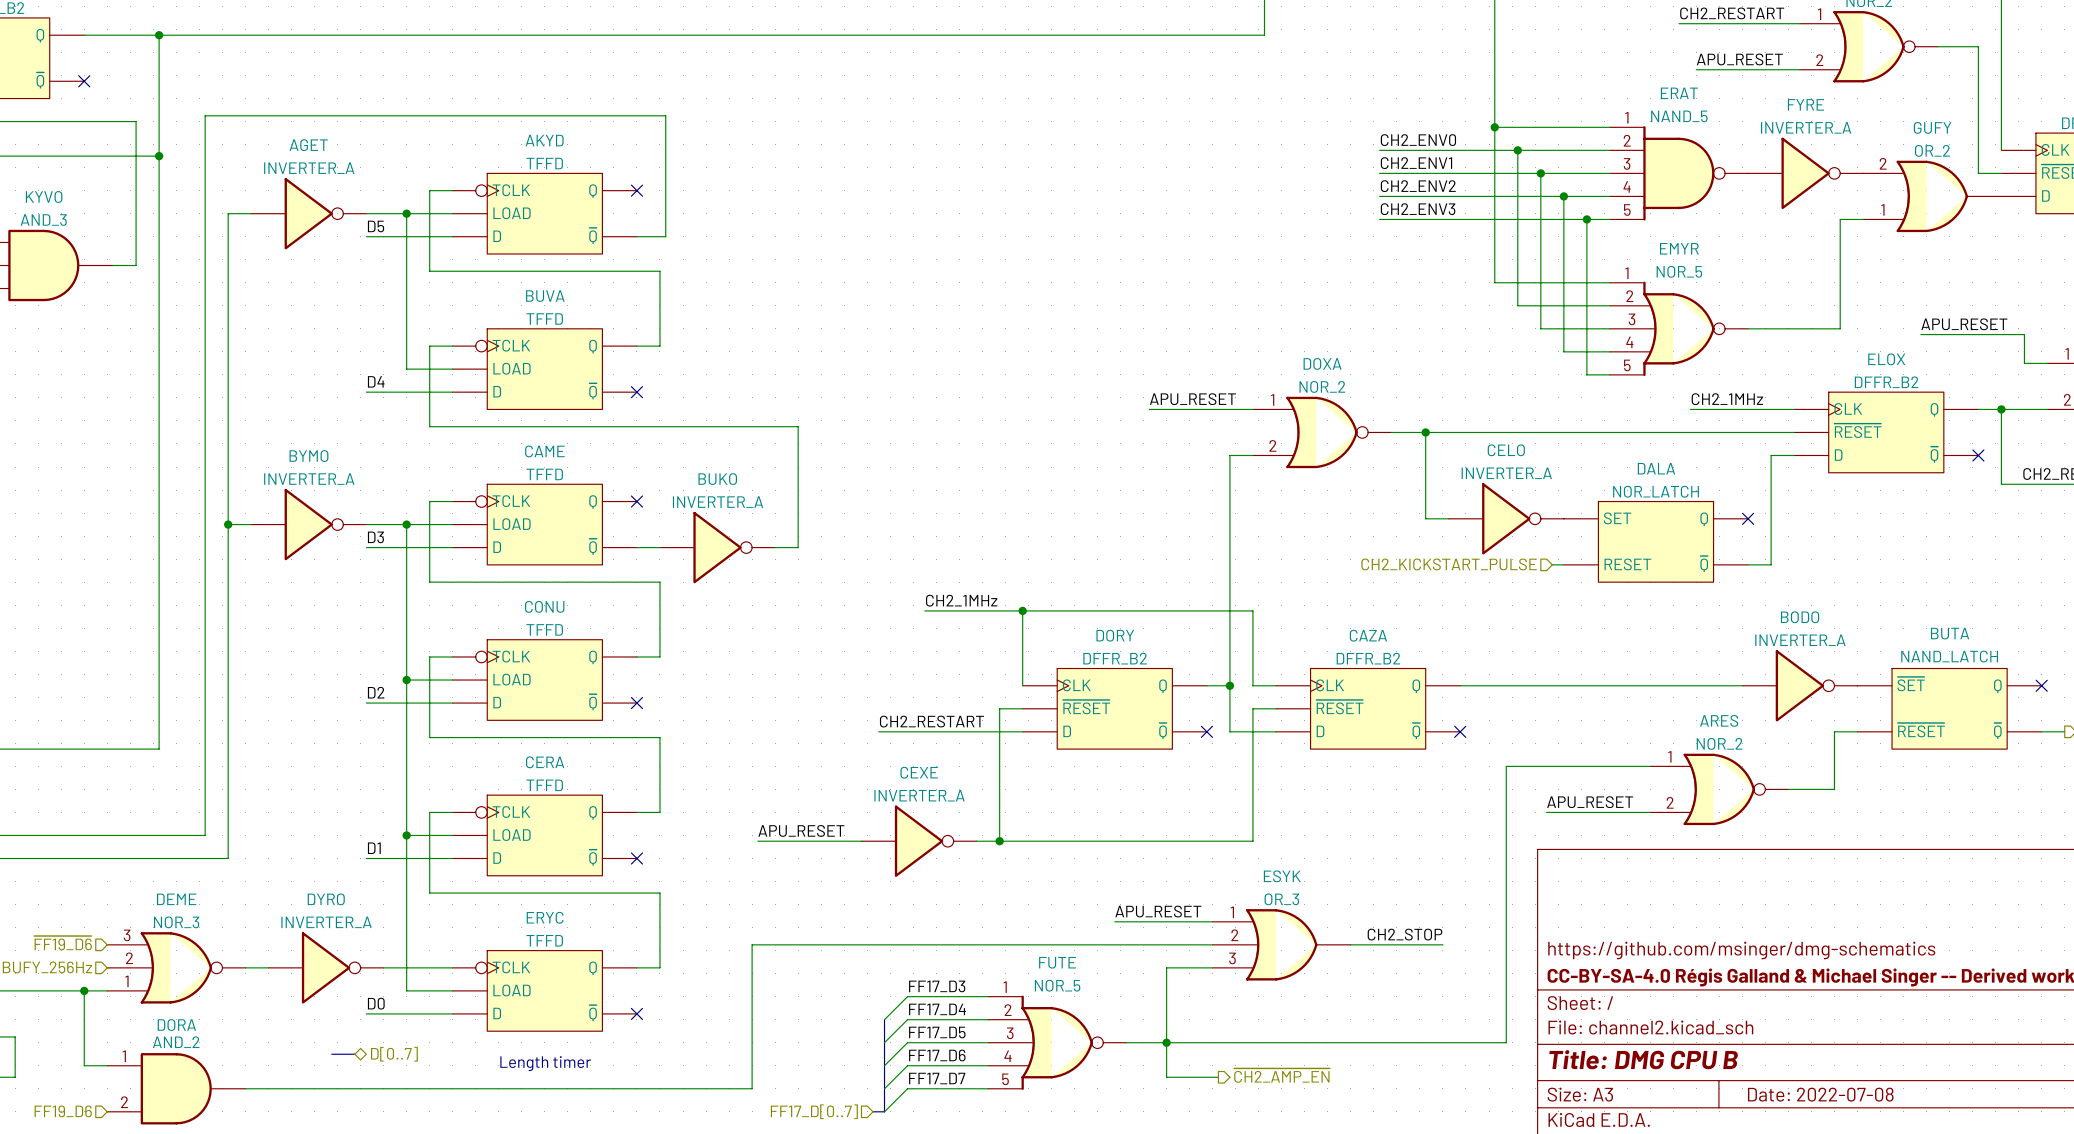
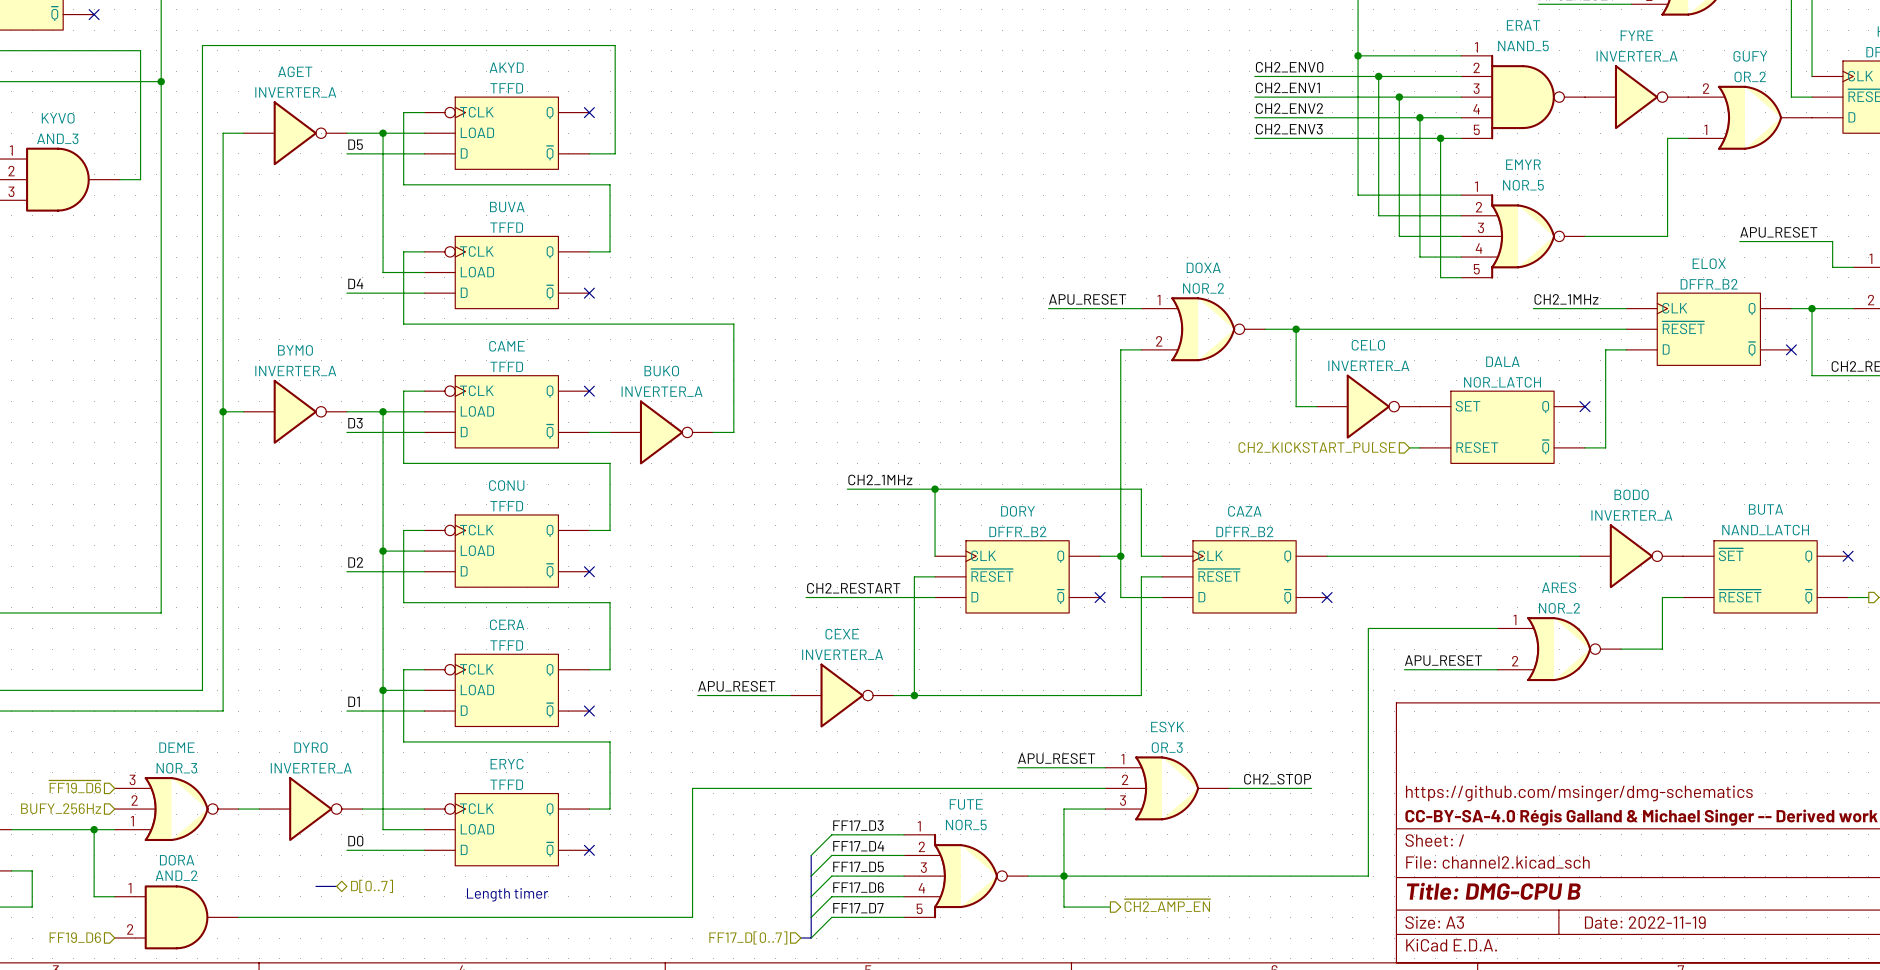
title block: Title: DMG CPU B (1643, 1059) -> Title: DMG-CPU B (1494, 891)
title block: Date: 2022-07-08 (1820, 1094) -> Date: 2022-11-19 (1645, 922)

